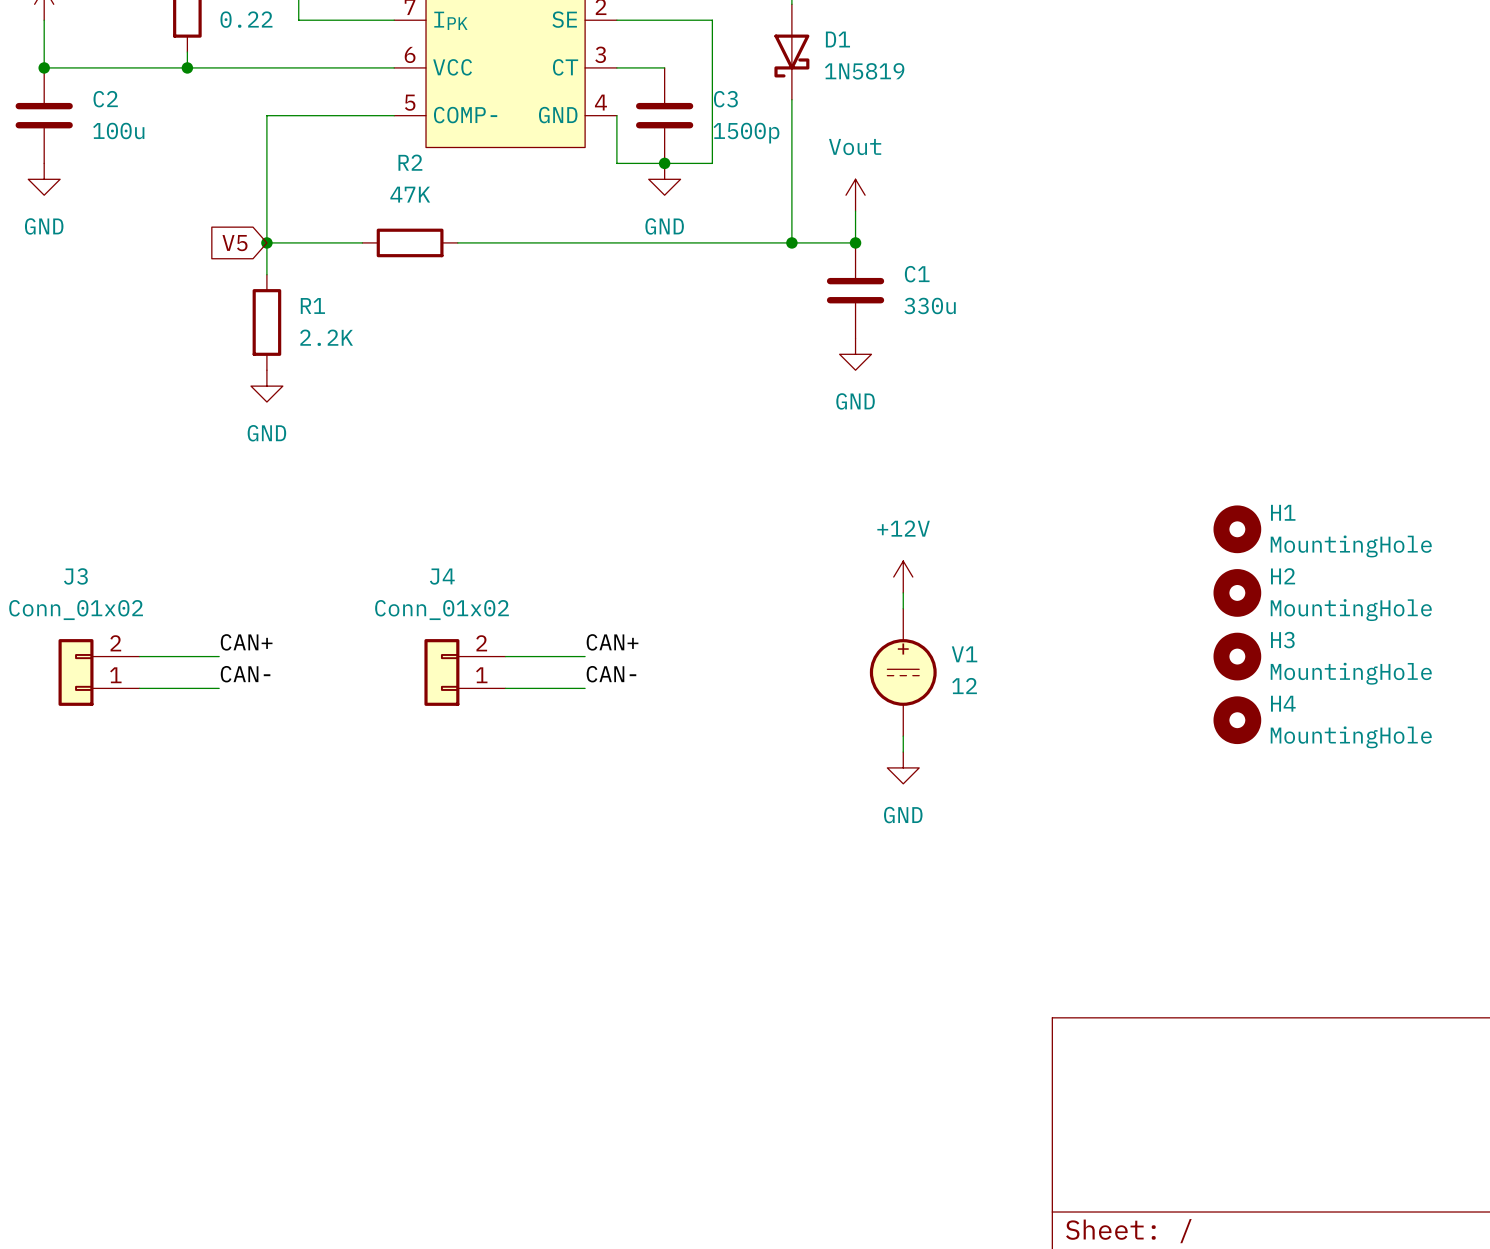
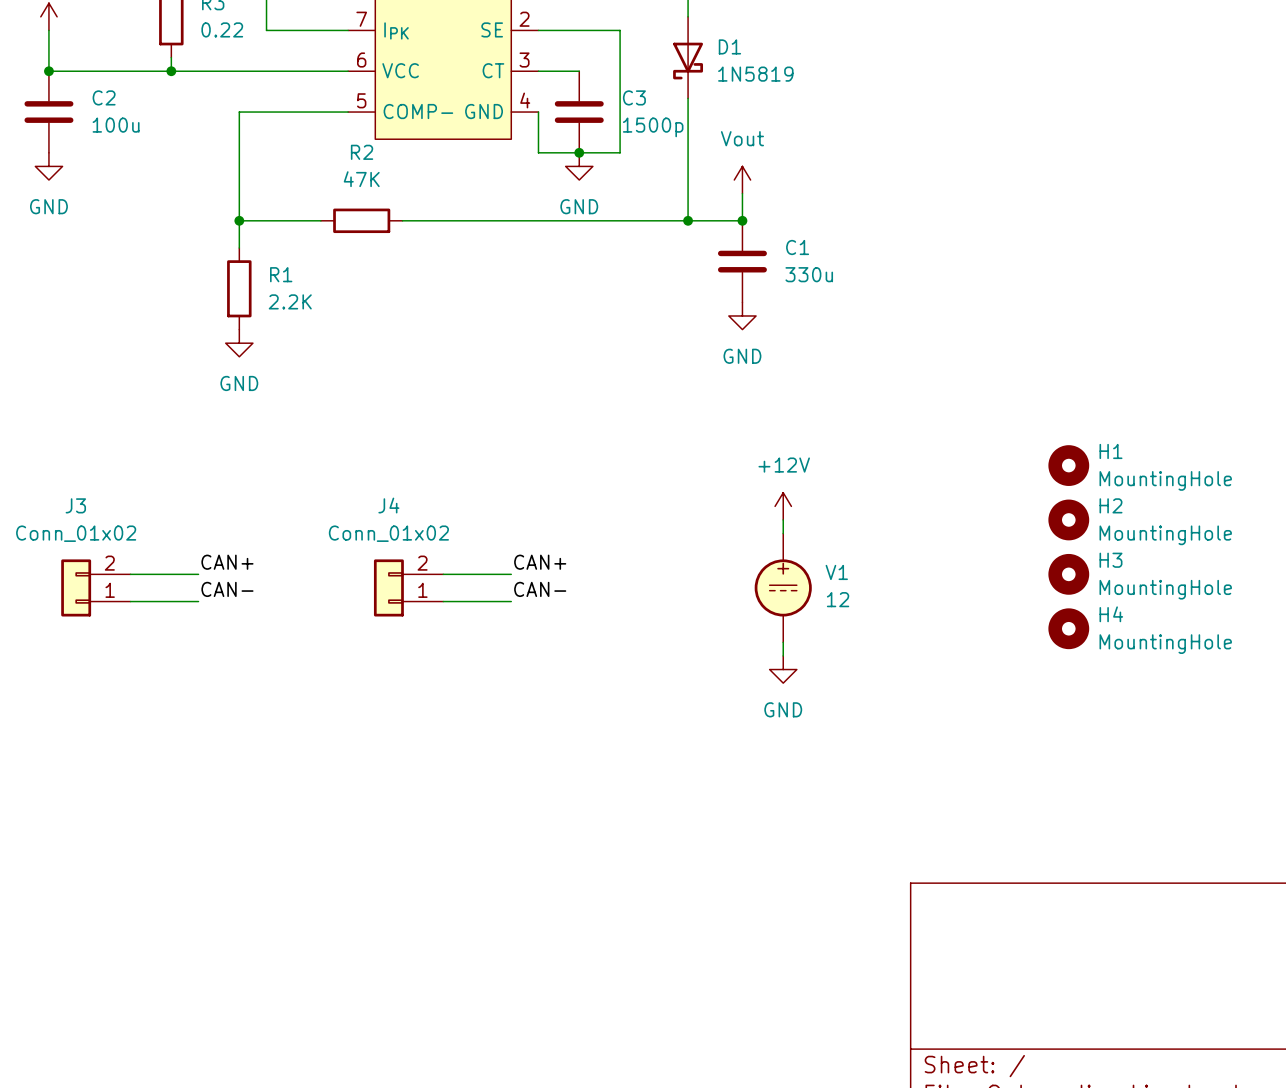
global label: V5 (234, 243) -> none

